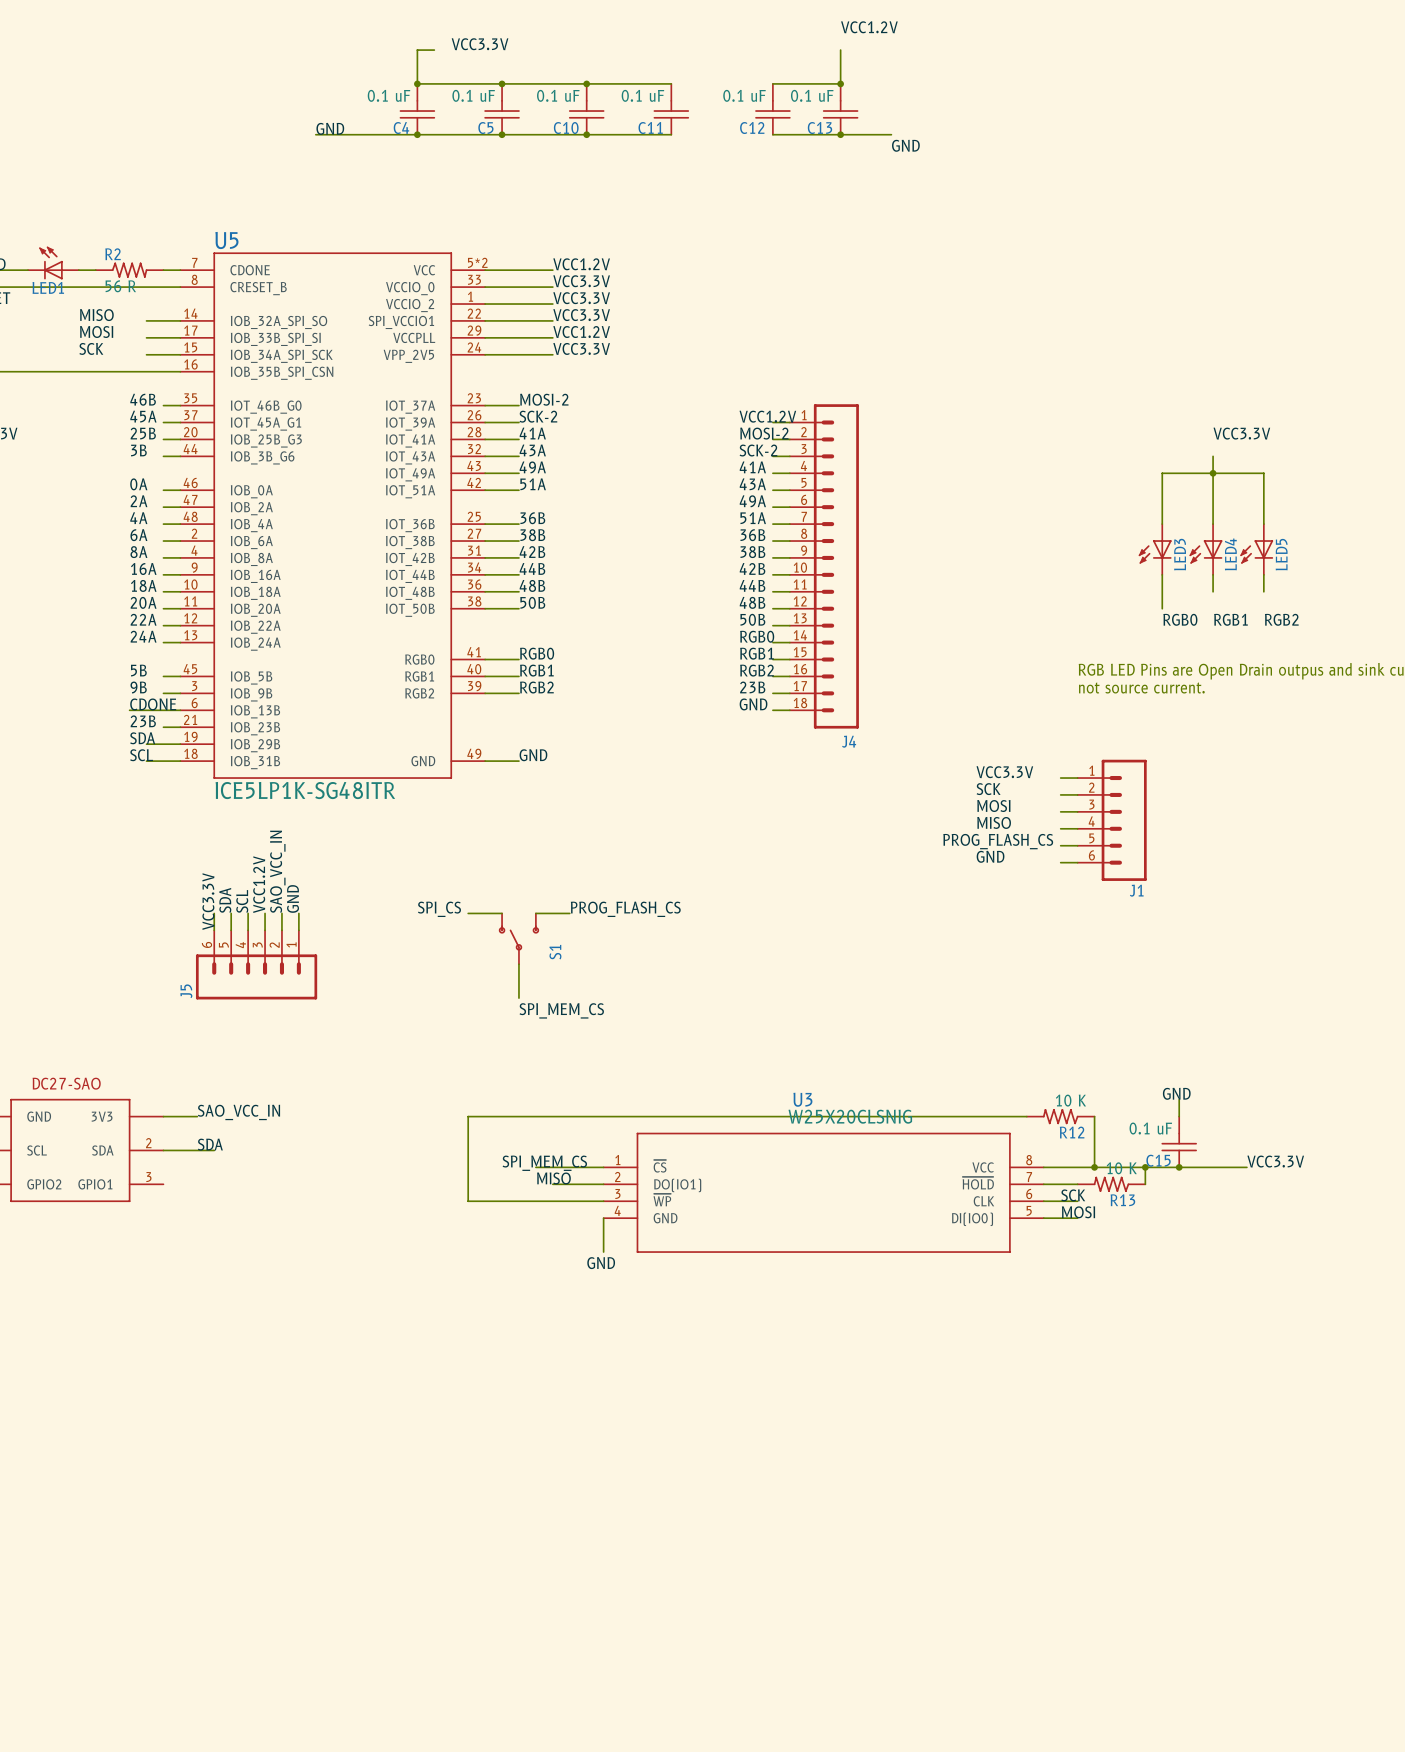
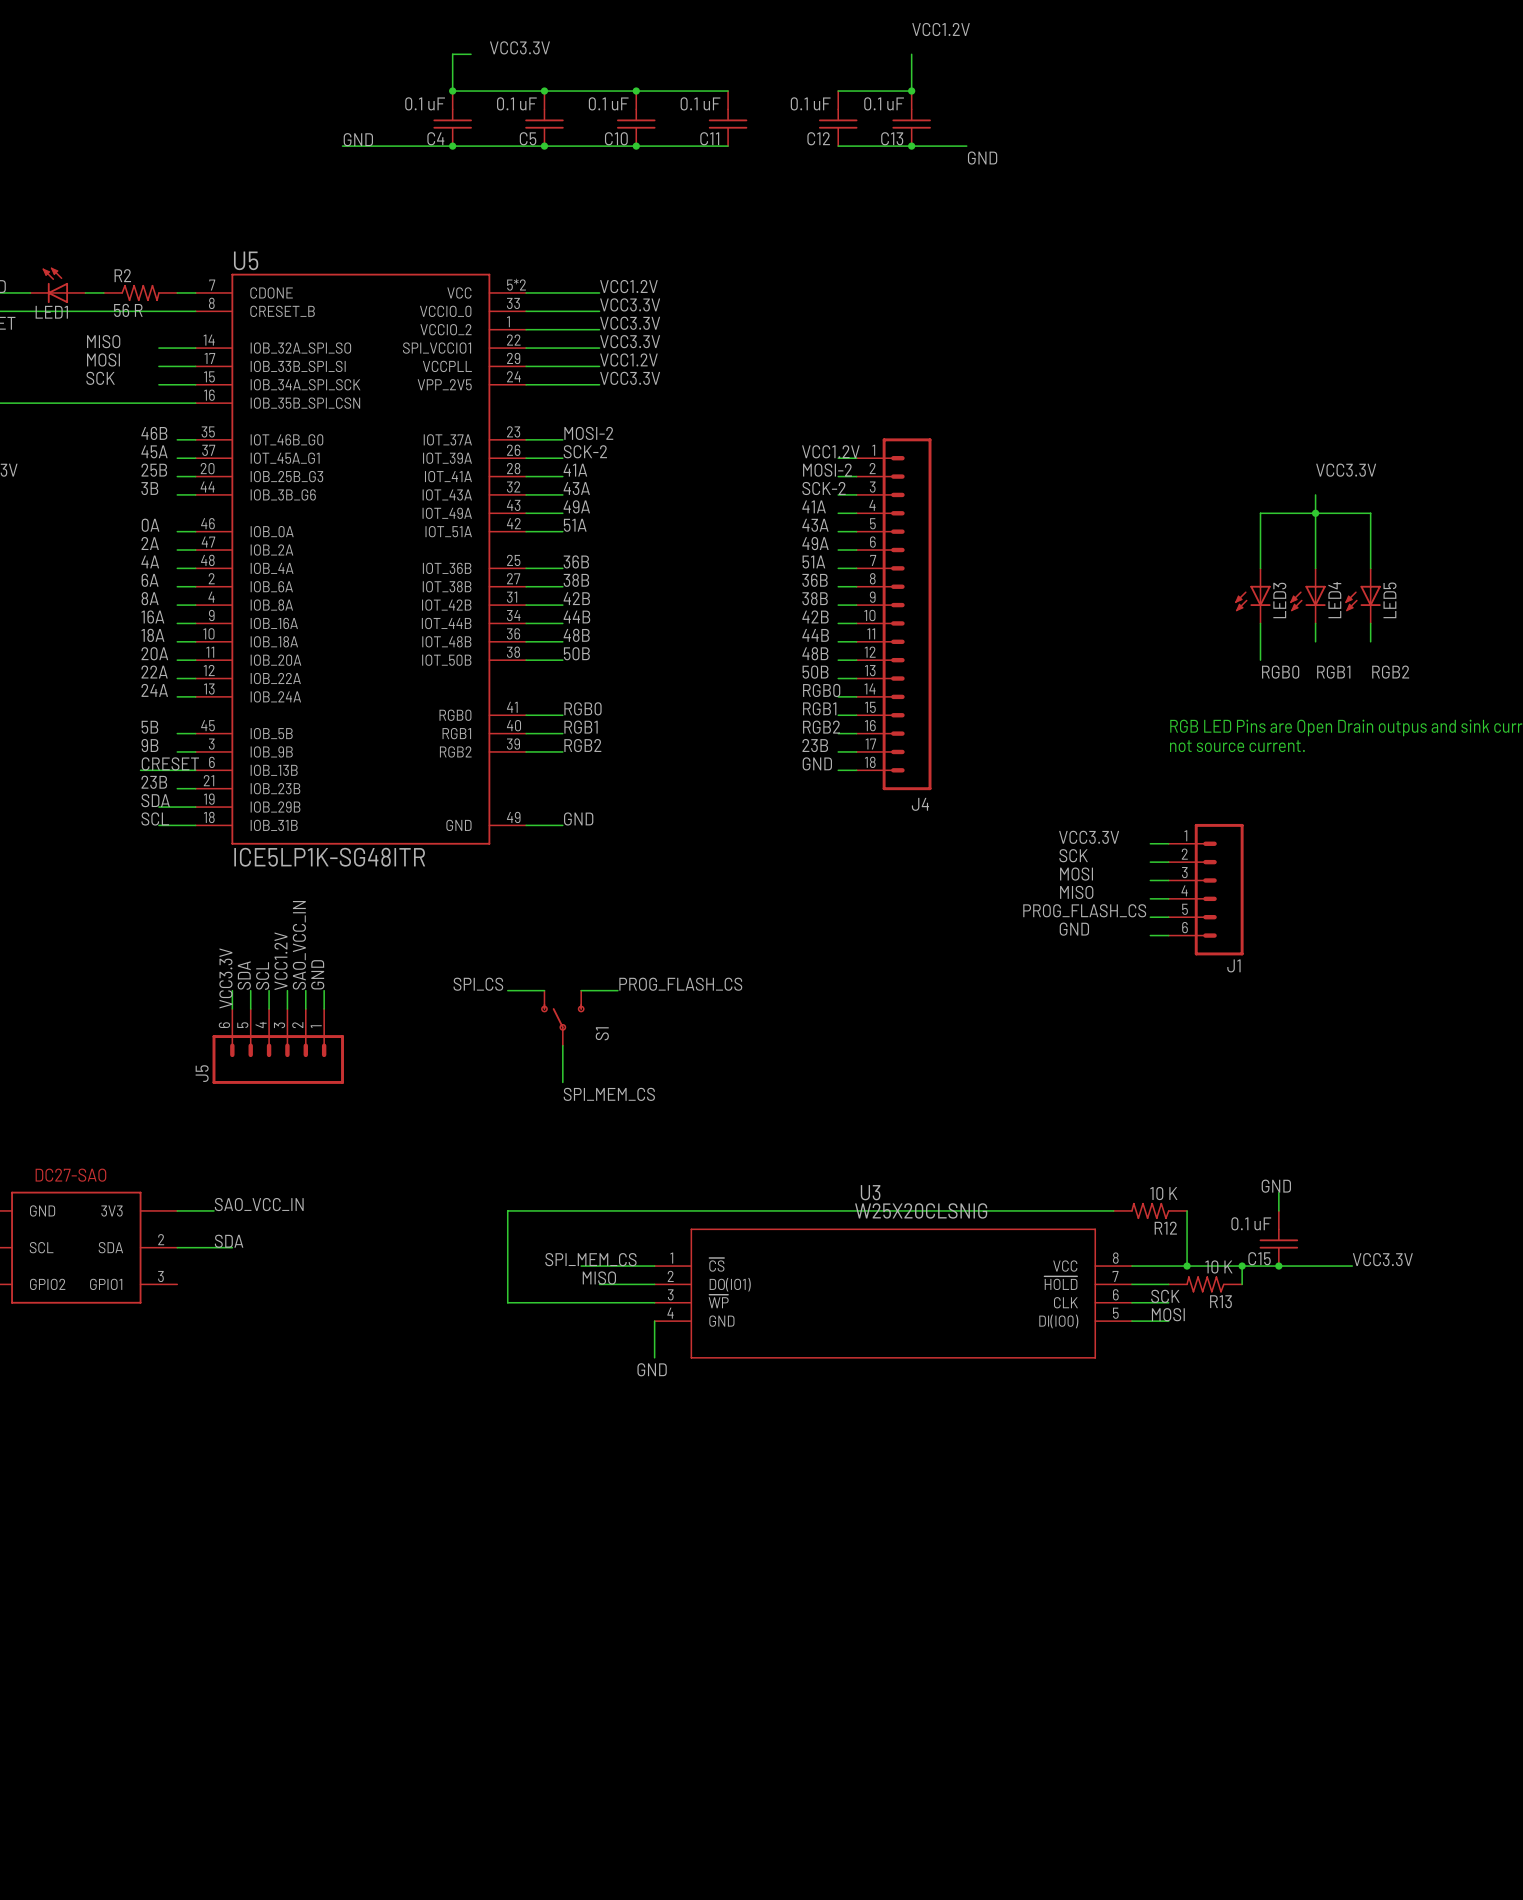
label: CDONE (153, 704) -> CRESET (170, 763)

